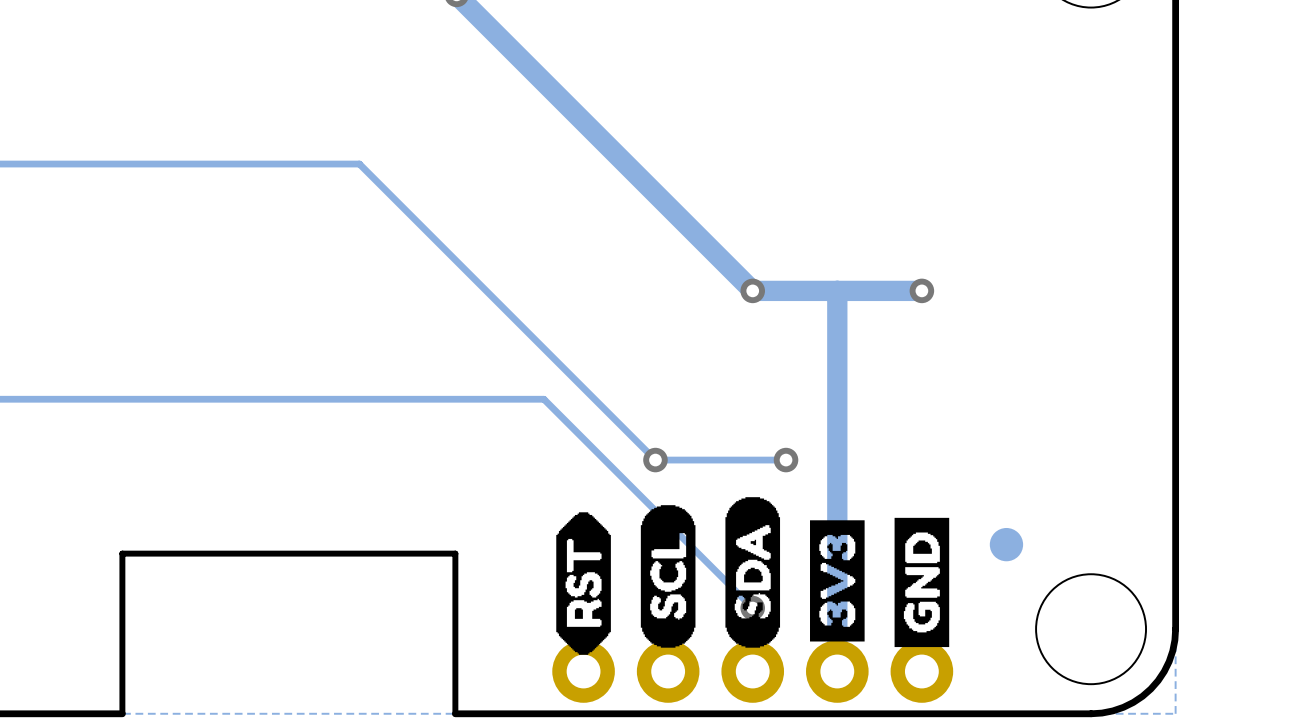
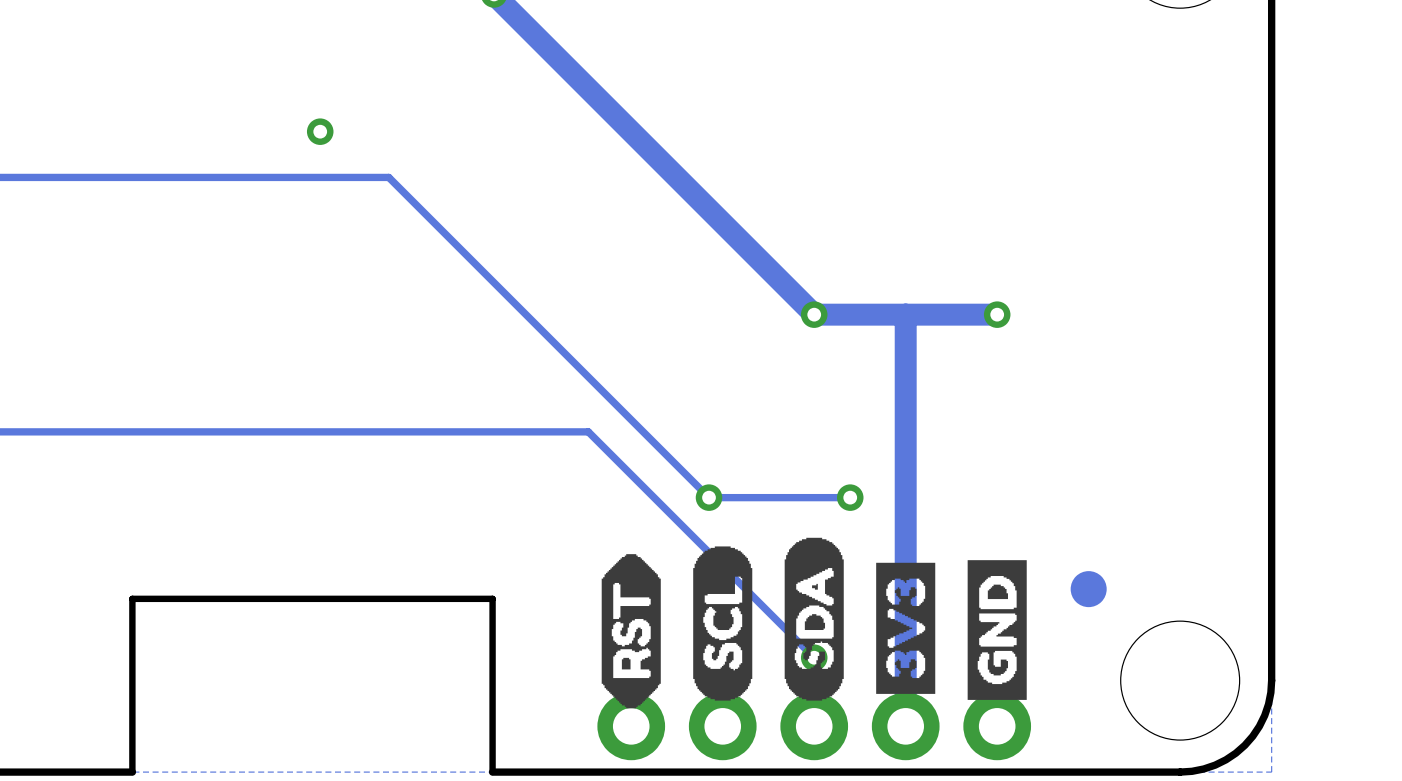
via: none -> (320, 131)

